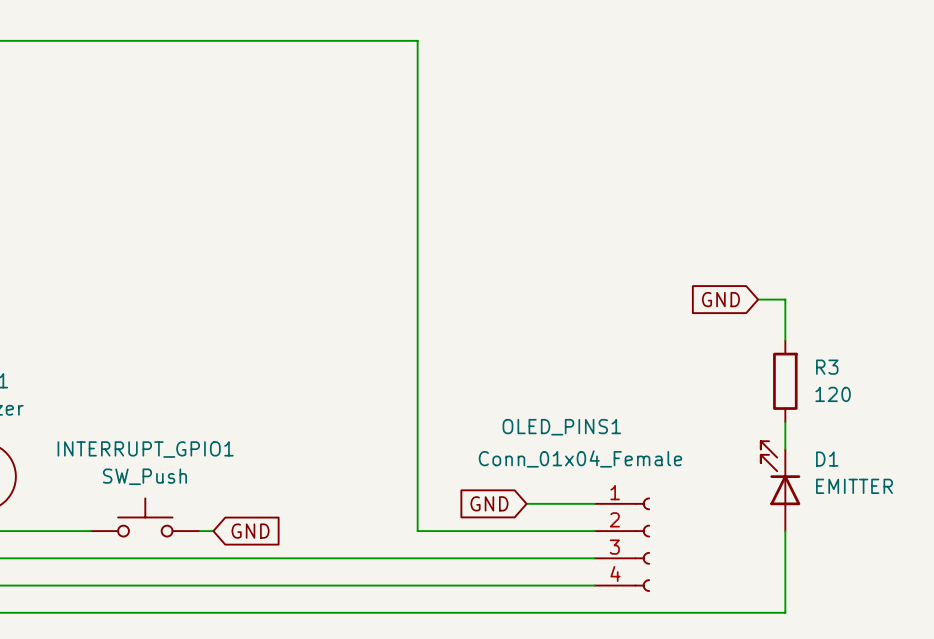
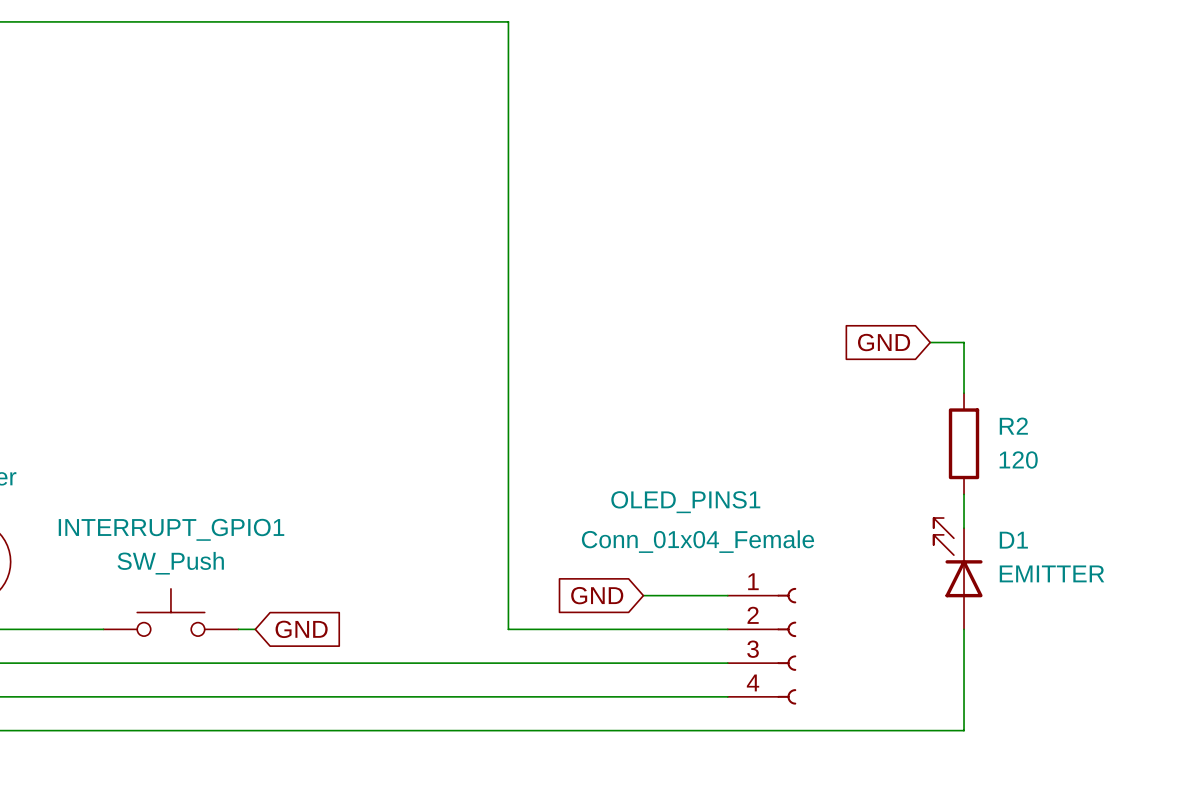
R3 name: R3 (827, 367) -> R2 (1013, 426)

